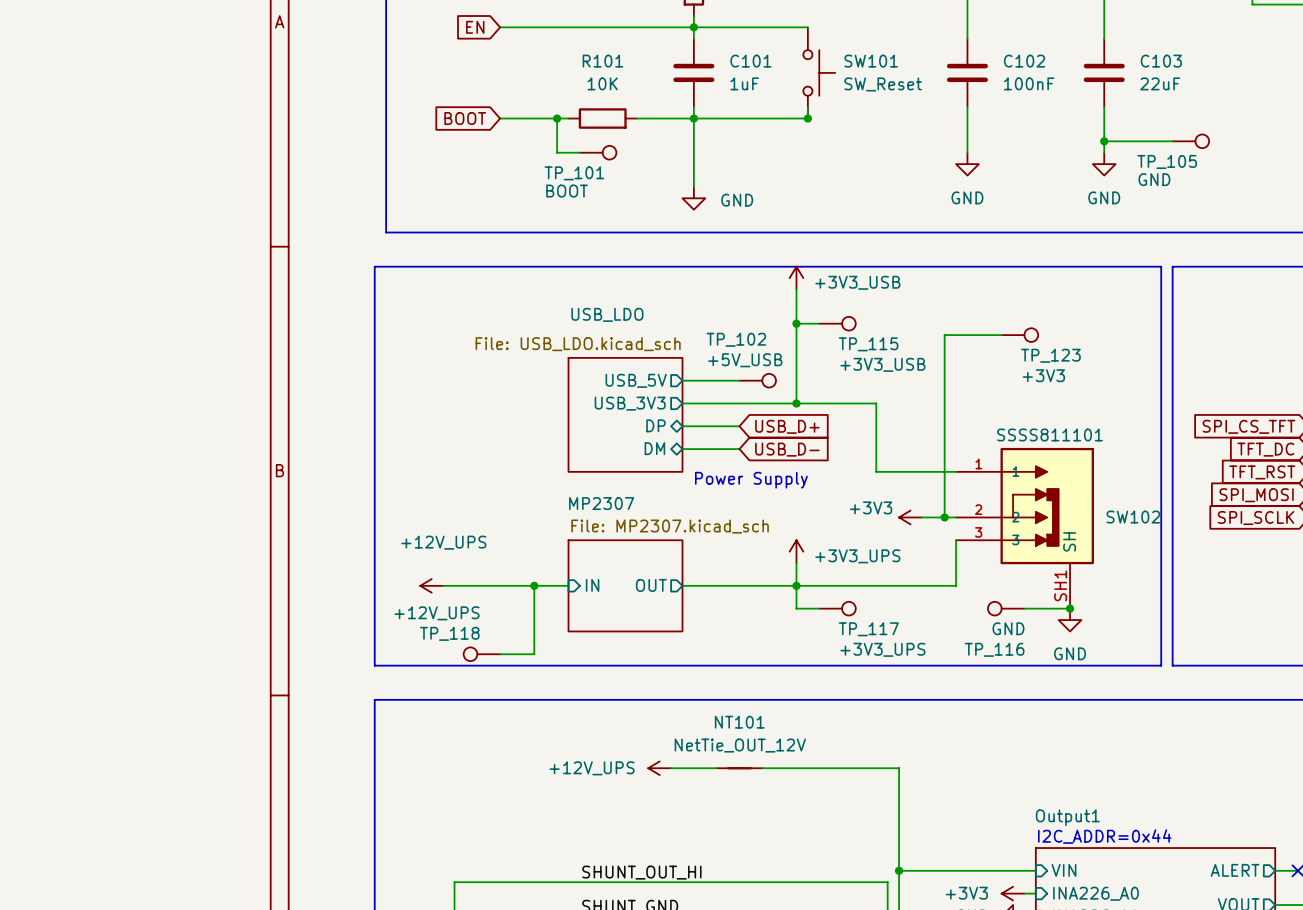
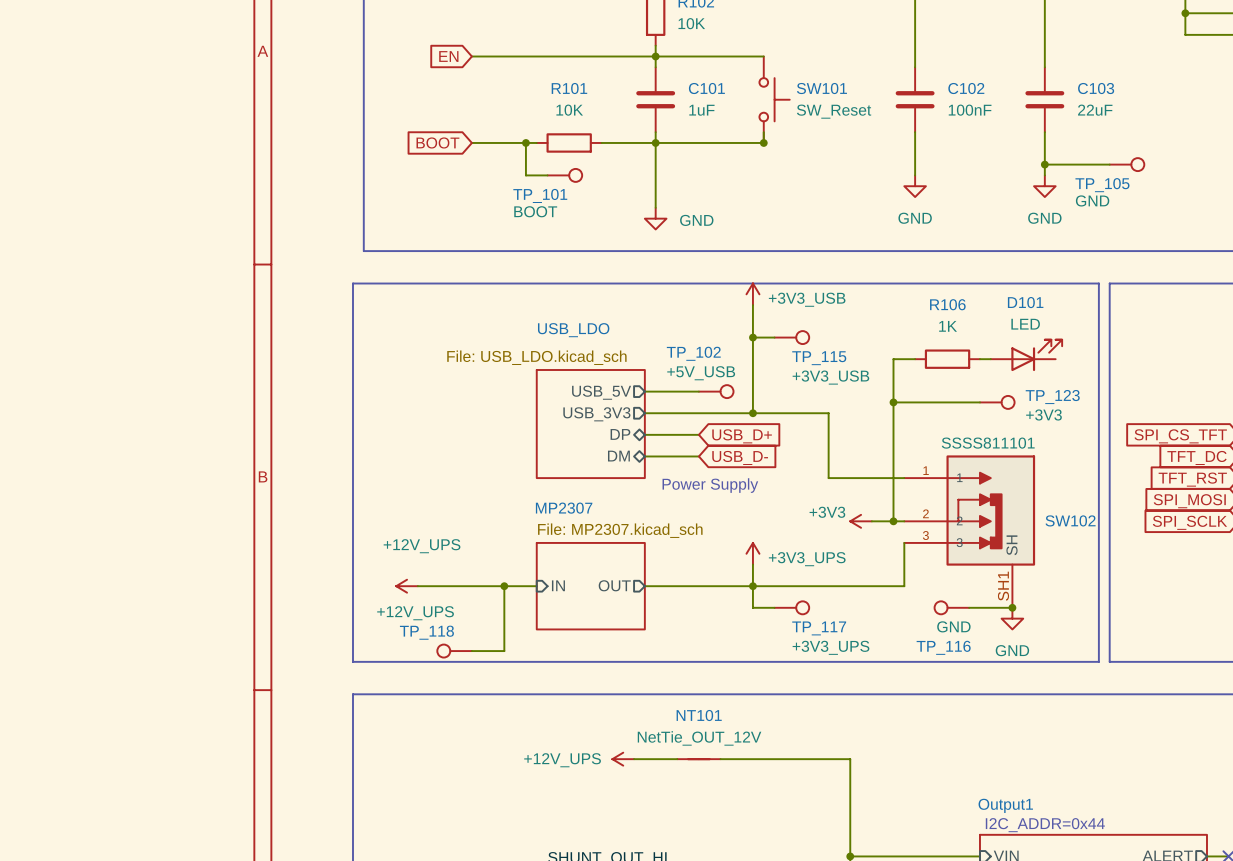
wire: (1001, 335) (944, 335) (944, 346) -> (915, 359) (893, 359)
TP_123 position: (1019, 335) -> (997, 402)
D101: none -> LED (1026, 355)
R106: none -> 1K (947, 359)
wire: none -> (979, 359) (990, 359)
TP_123 name position: TP_123 (1050, 355) -> TP_123 (1052, 397)
TP_123 value position: +3V3 (1043, 375) -> +3V3 (1043, 414)
wire: none -> (893, 402) (979, 402)
junction: none -> (893, 402)

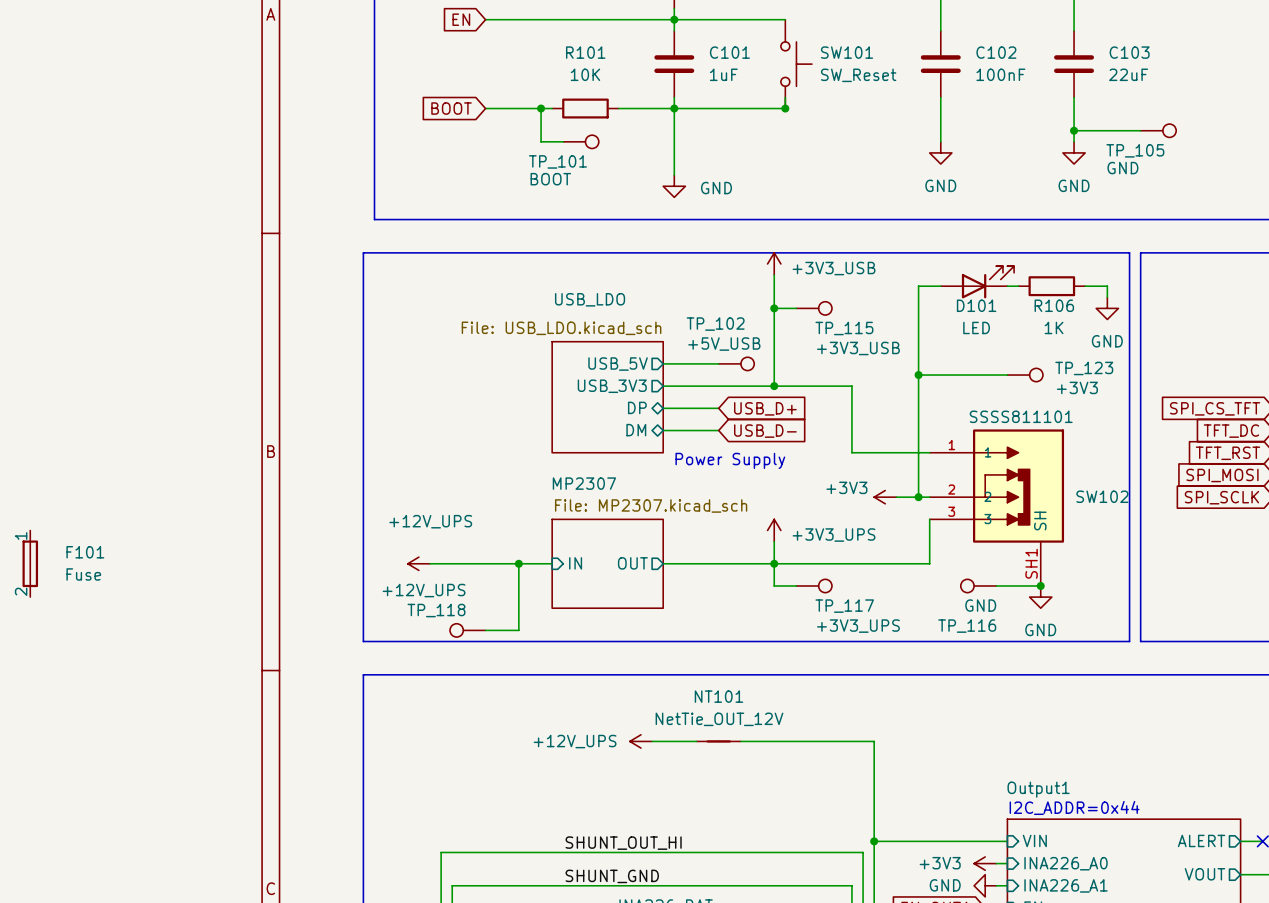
D101 name position: D101 (1025, 302) -> D101 (976, 305)
R106 name position: R106 (947, 304) -> R106 (1054, 305)
wire: none -> (1085, 286) (1107, 286) (1107, 297)
D101 value position: LED (1025, 324) -> LED (976, 327)
R106 value position: 1K (948, 326) -> 1K (1054, 327)
power symbol: none -> GND (1107, 308)
D101 position: (1026, 355) -> (977, 282)
wire: (893, 359) (915, 359) -> (918, 330) (918, 286) (940, 286)
R106 position: (947, 359) -> (1051, 286)
wire: (979, 359) (990, 359) -> (1007, 286) (1018, 286)
F101: none -> Fuse (30, 563)

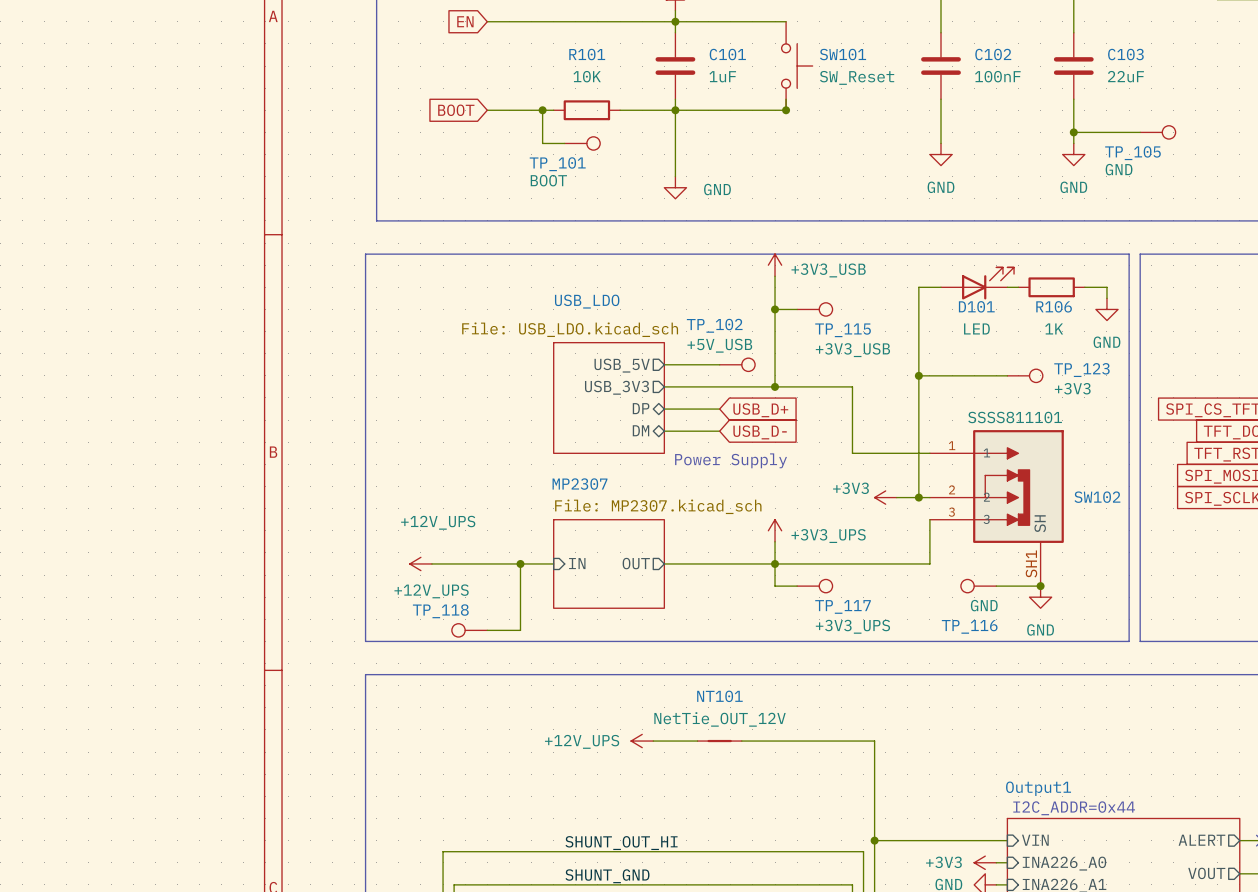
F101: Fuse (30, 563) -> none

